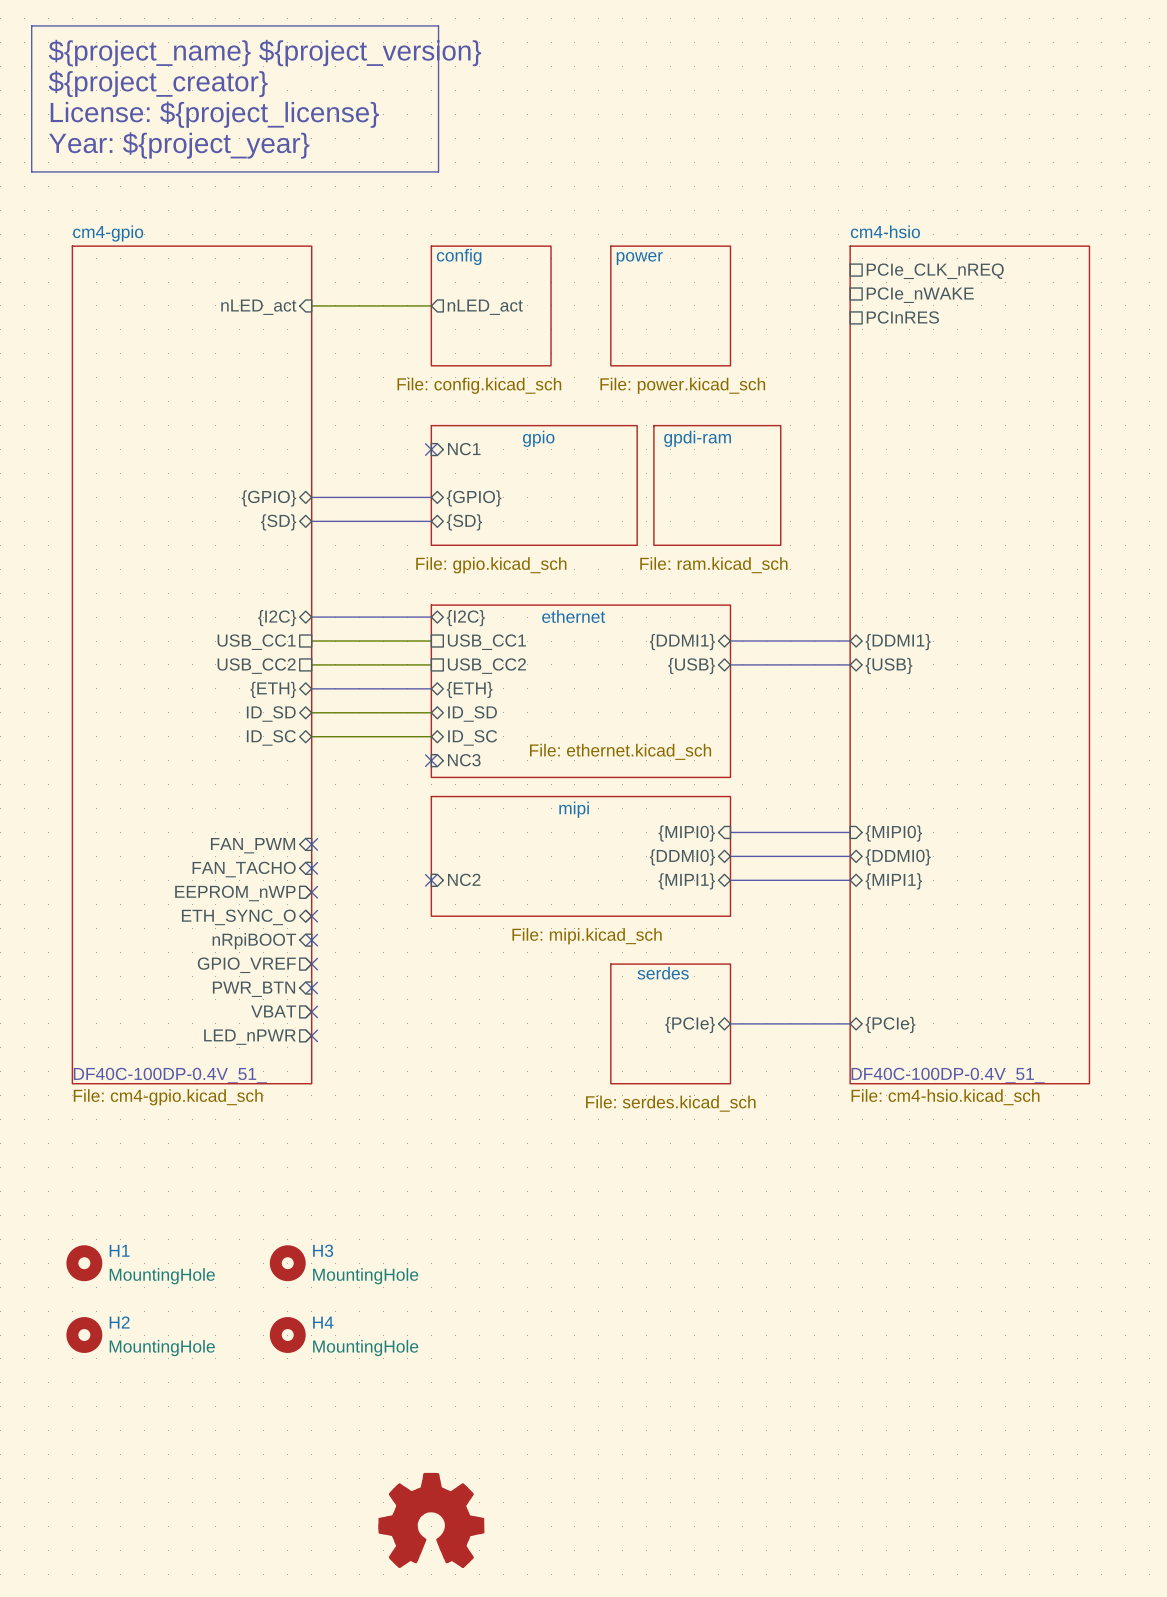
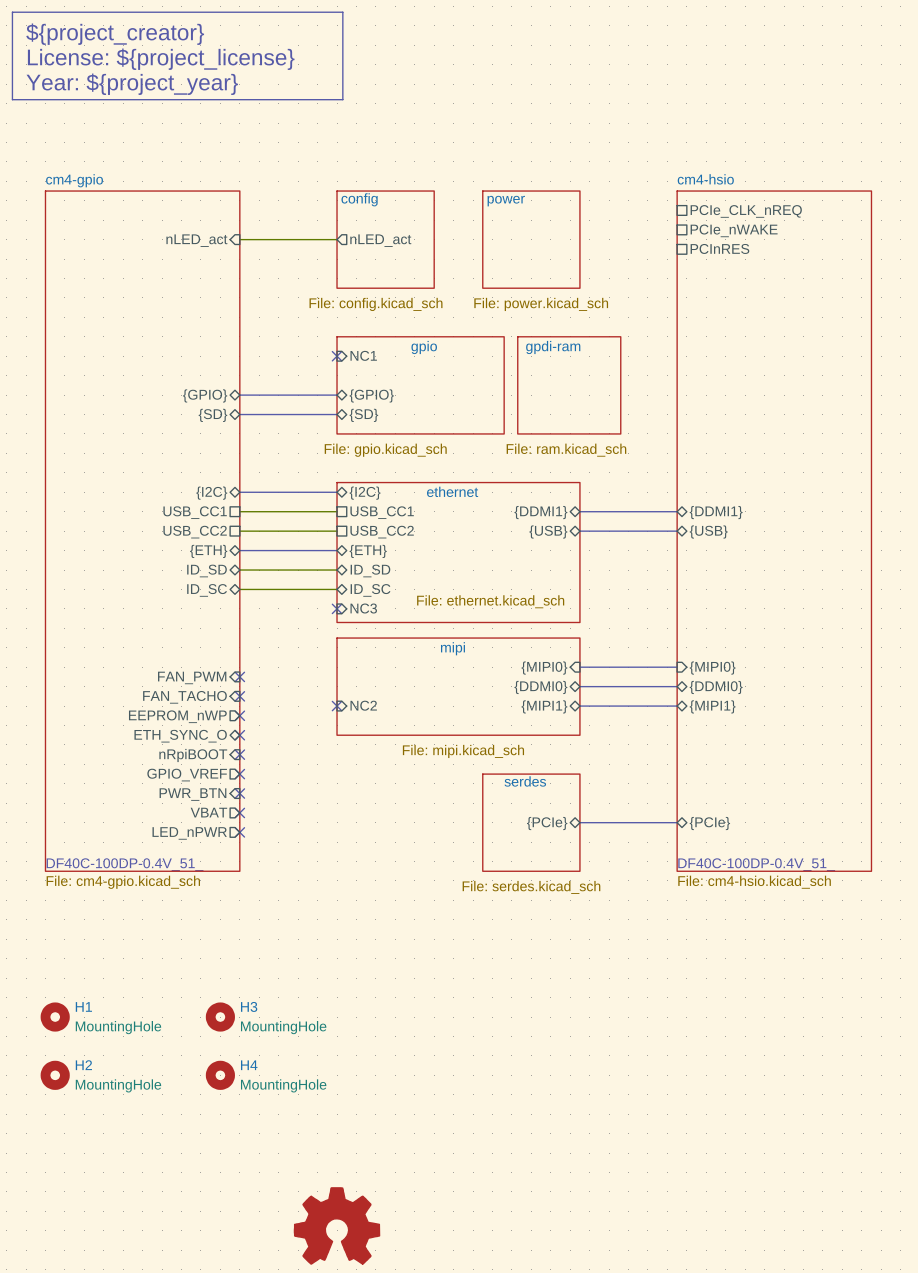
text: ${project_name} ${project_version} (264, 53) -> ${project_creator} (115, 34)
text: ${project_creator} (158, 83) -> License: ${project_license} (161, 59)
text: License: ${project_license} (214, 114) -> Year: ${project_year} (132, 84)
line: (31, 133) (31, 171) (438, 171) (438, 133) -> (12, 99) (342, 99)
text: Year: ${project_year} (179, 145) -> none

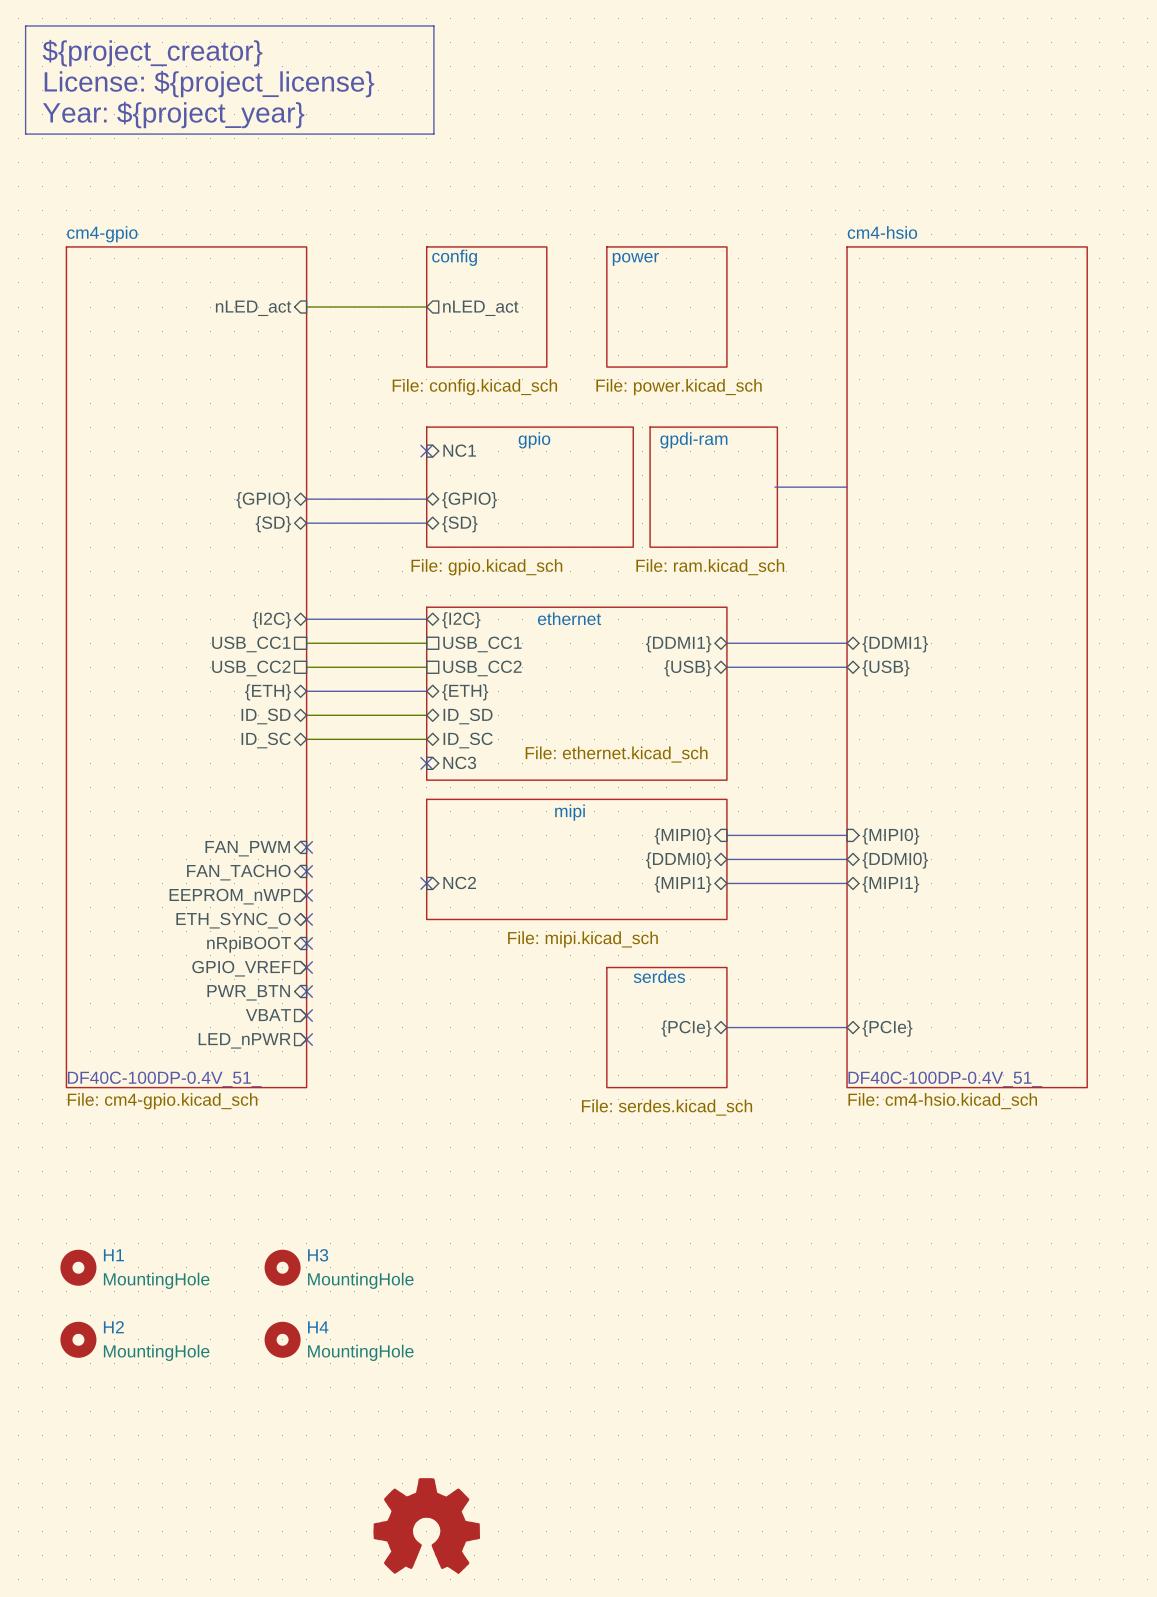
sheet pin: PCIe_CLK_nREQ (746, 211) -> none
sheet pin: PCIe_nWAKE (734, 230) -> none
sheet pin: PCInRES (719, 248) -> none
bus: none -> (774, 487) (847, 487)

